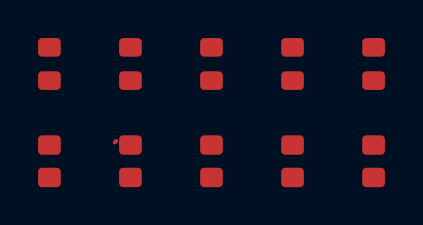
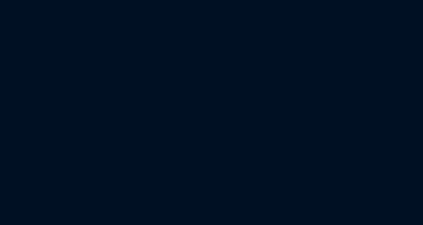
part: (49, 63) -> none
part: (130, 63) -> none
part: (211, 63) -> none
part: (292, 63) -> none
part: (373, 63) -> none
top track: (116, 140) (114, 142) -> none
part: (49, 161) -> none
part: (130, 161) -> none
part: (211, 161) -> none
part: (292, 161) -> none
part: (373, 161) -> none

